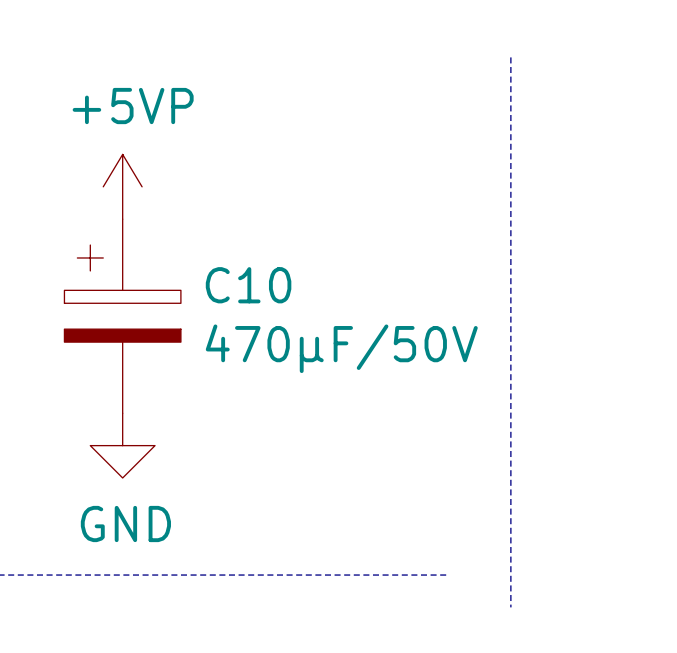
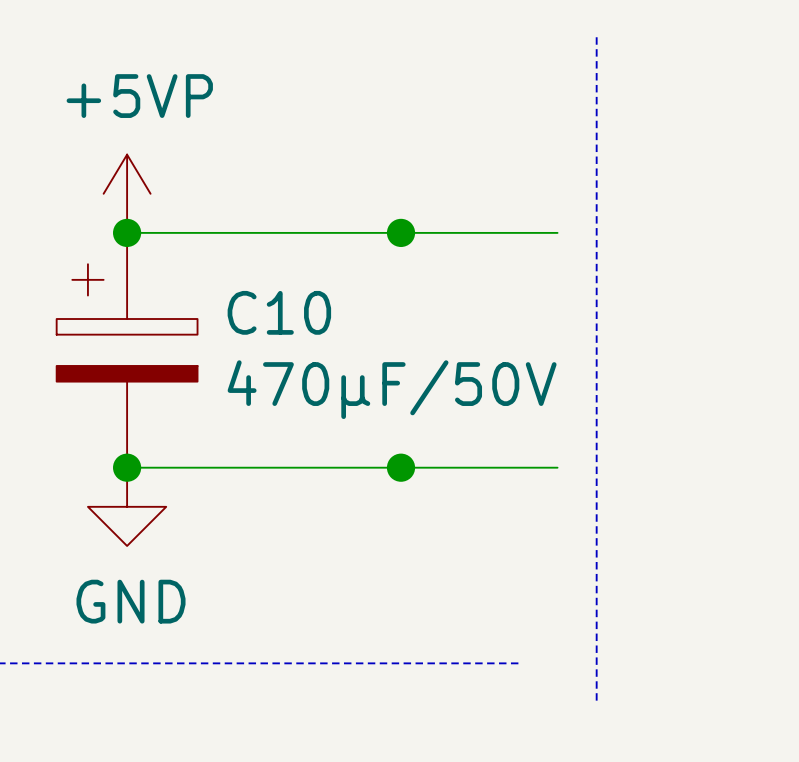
wire: none -> (127, 232) (557, 232)
junction: none -> (127, 232)
junction: none -> (401, 232)
wire: none -> (127, 467) (557, 467)
junction: none -> (127, 467)
junction: none -> (401, 467)

